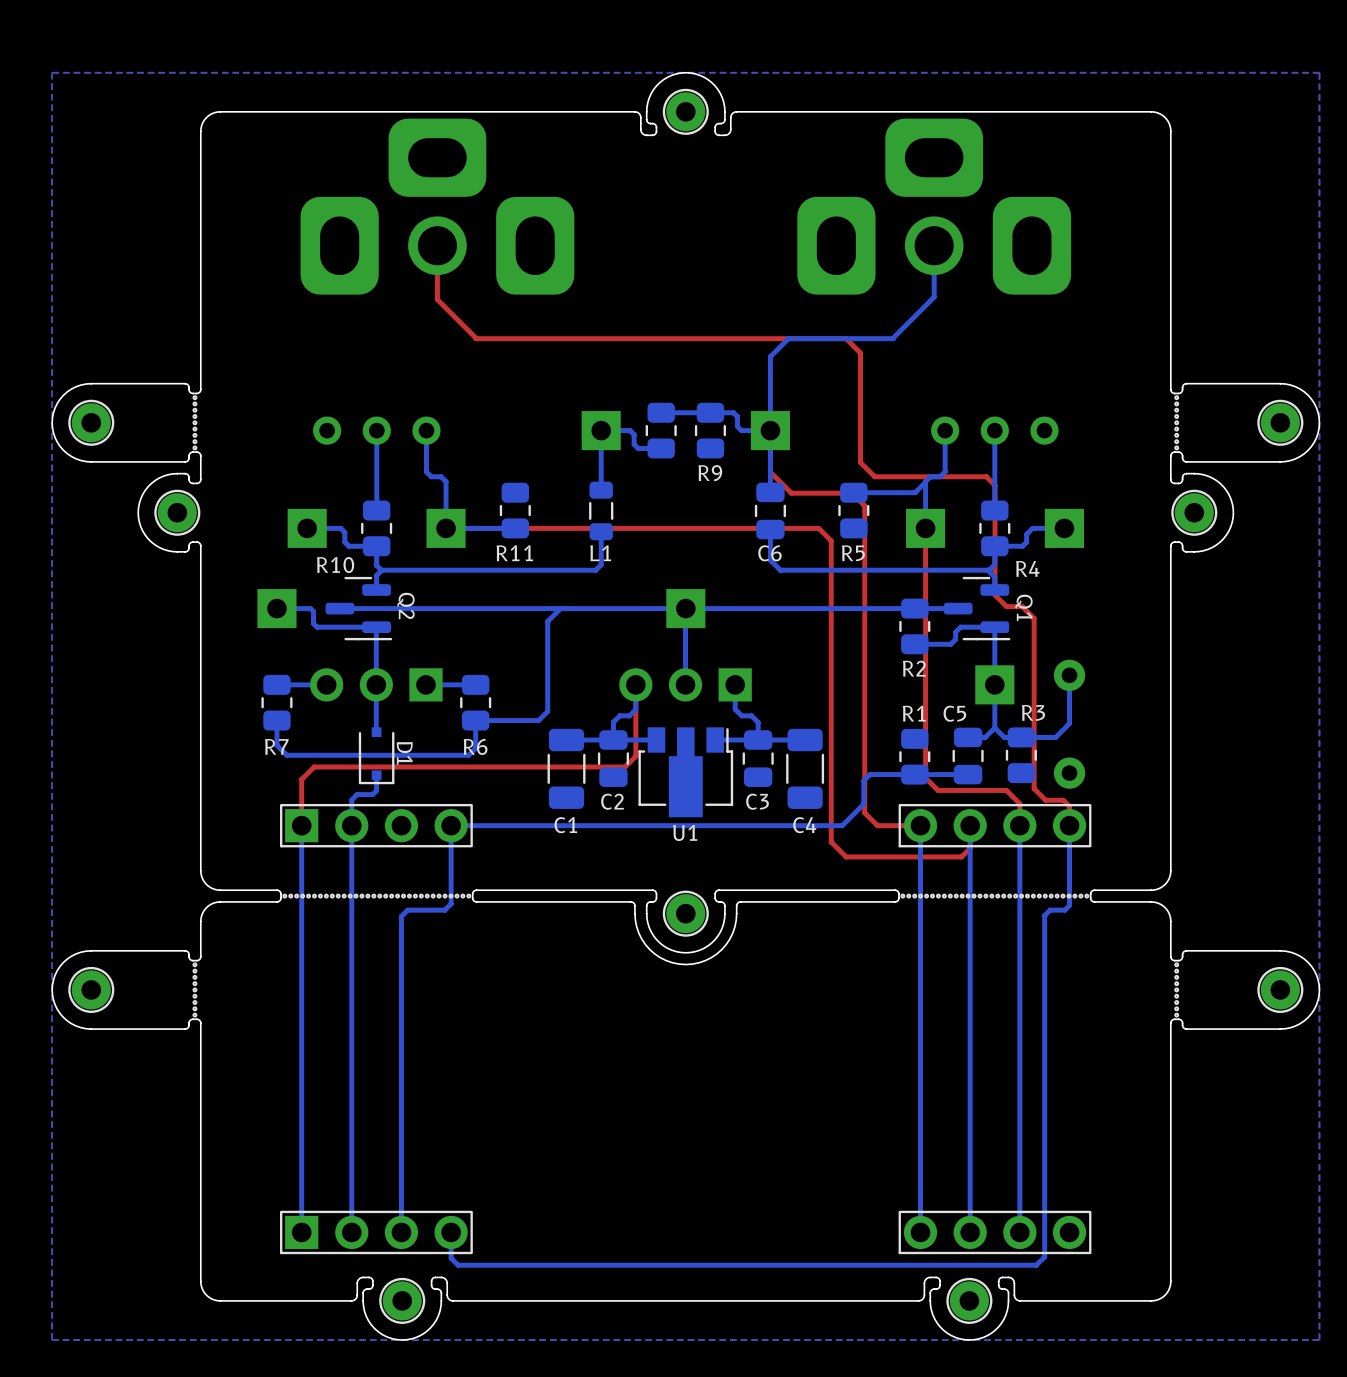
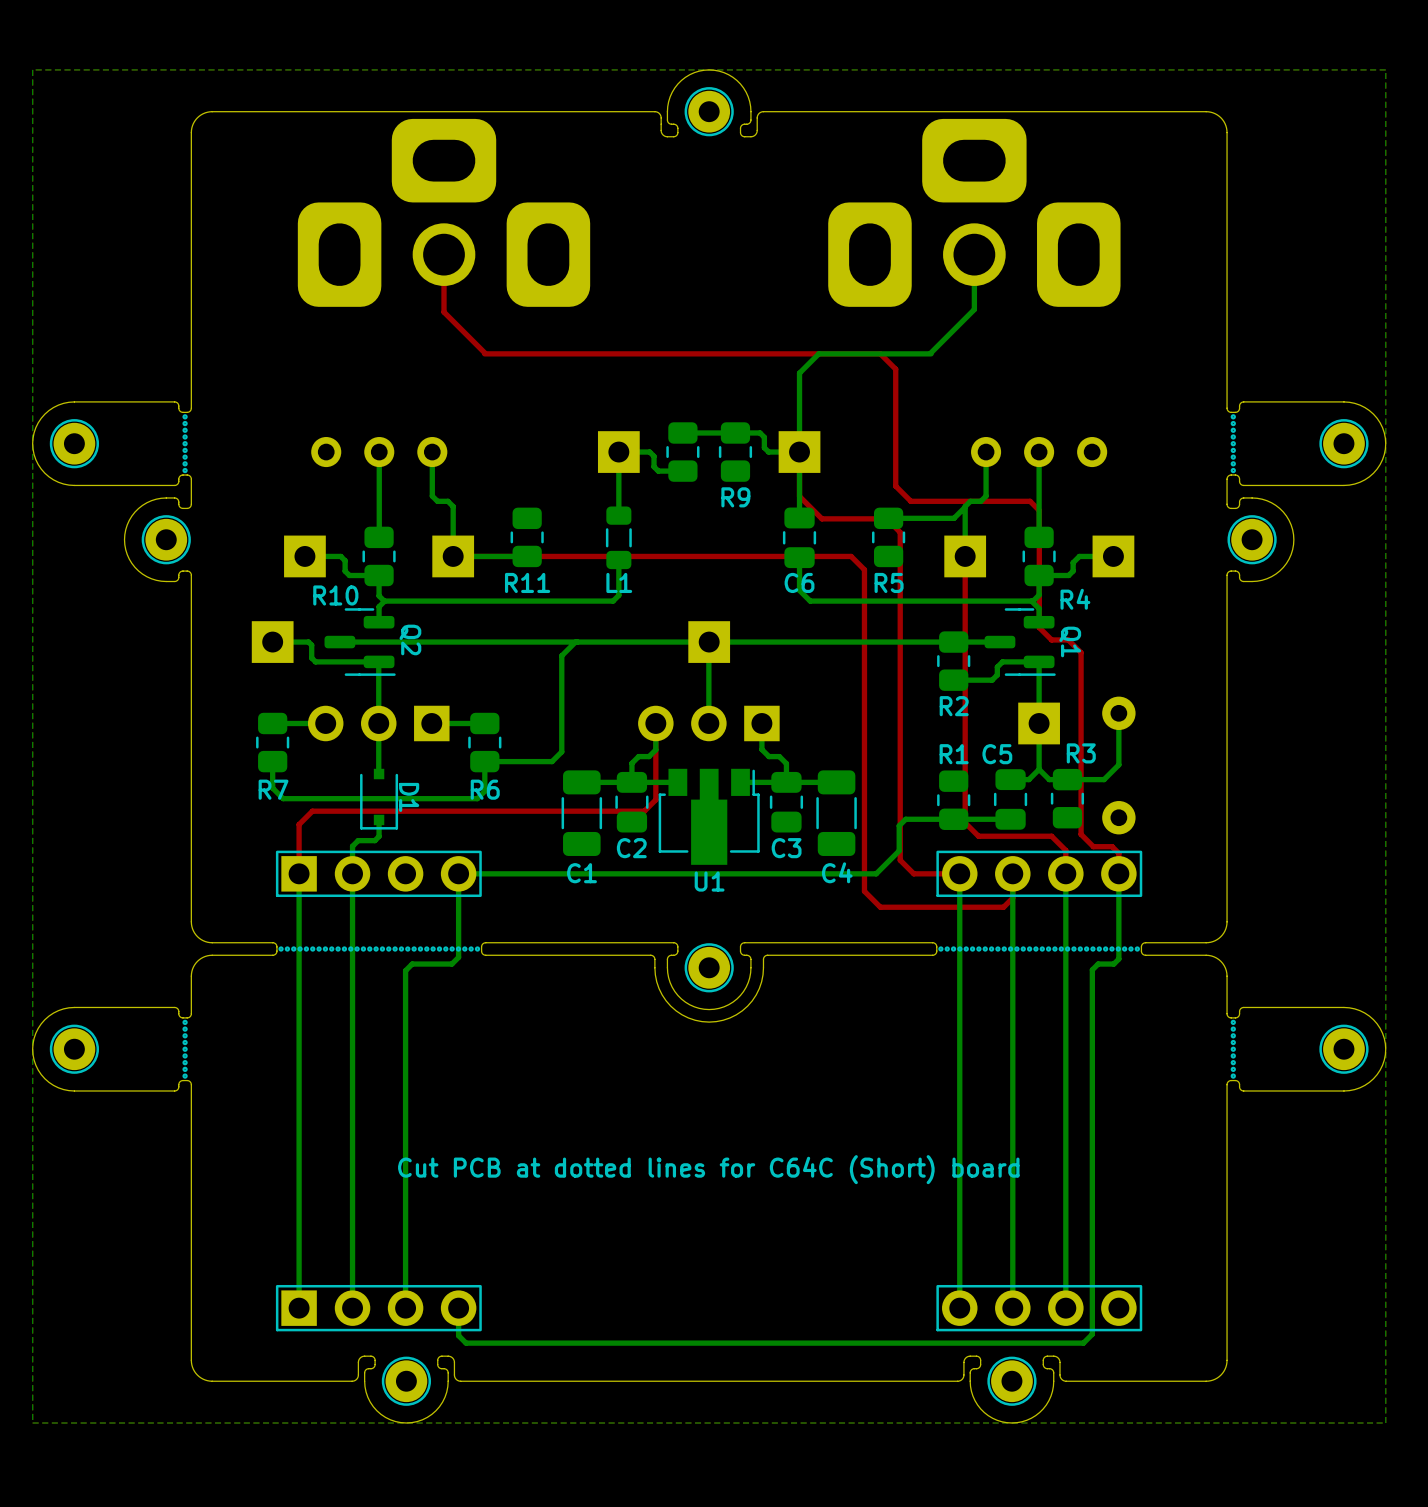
text: none -> Cut PCB at dotted lines for C64C (Short) board (708, 1169)

